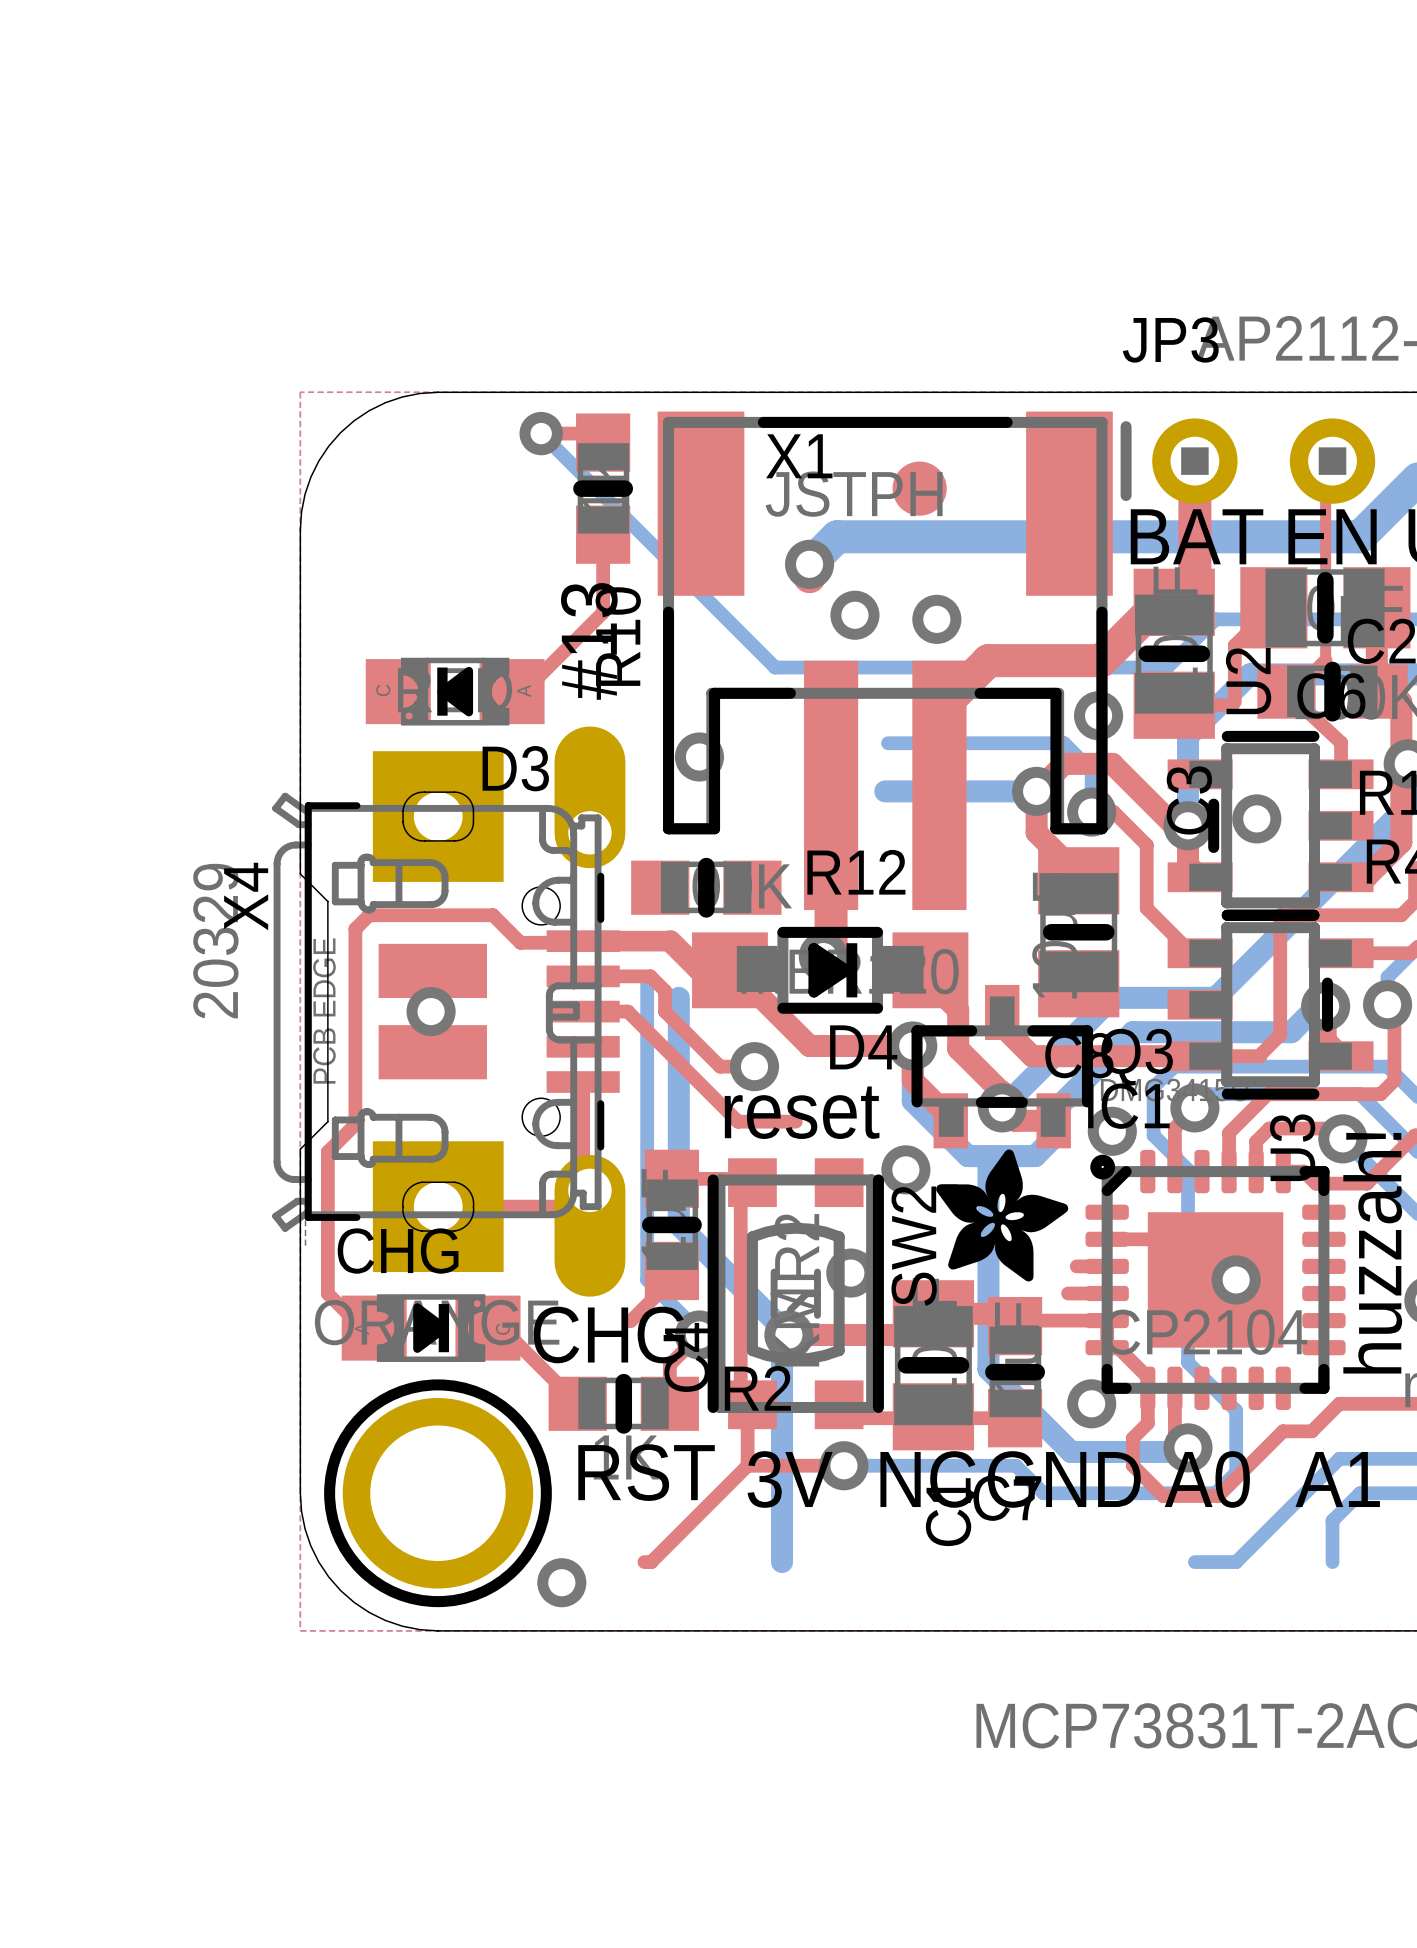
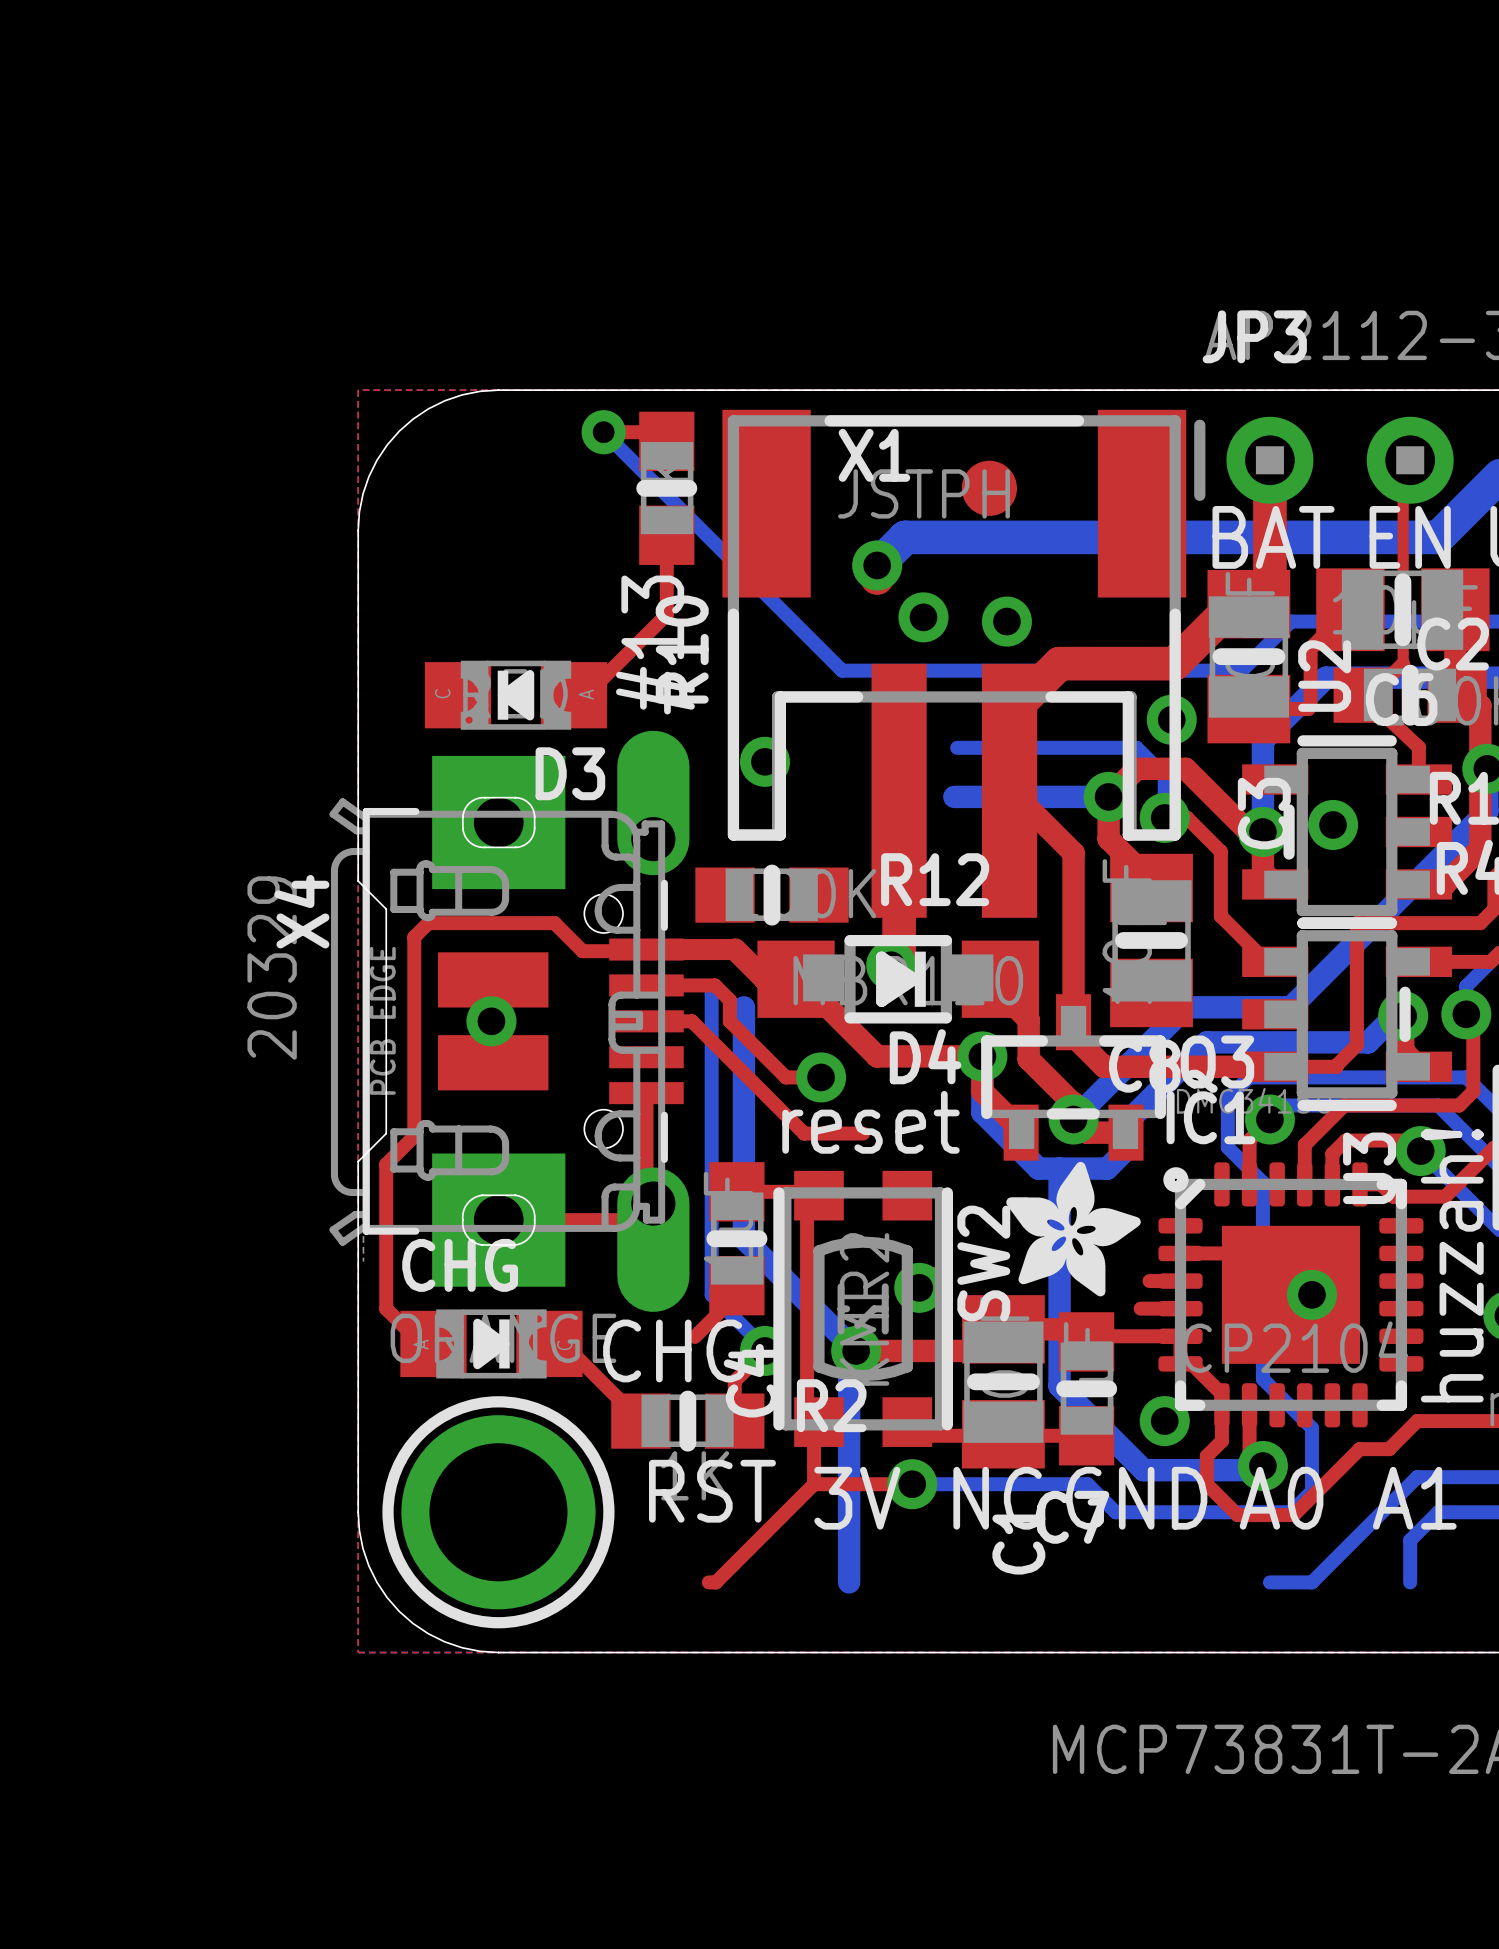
top track: none -> (1017, 796) (1073, 853) (1073, 1022)
via: (1112, 1131) -> none
via: (905, 1169) -> none
via: (561, 1582) -> none

